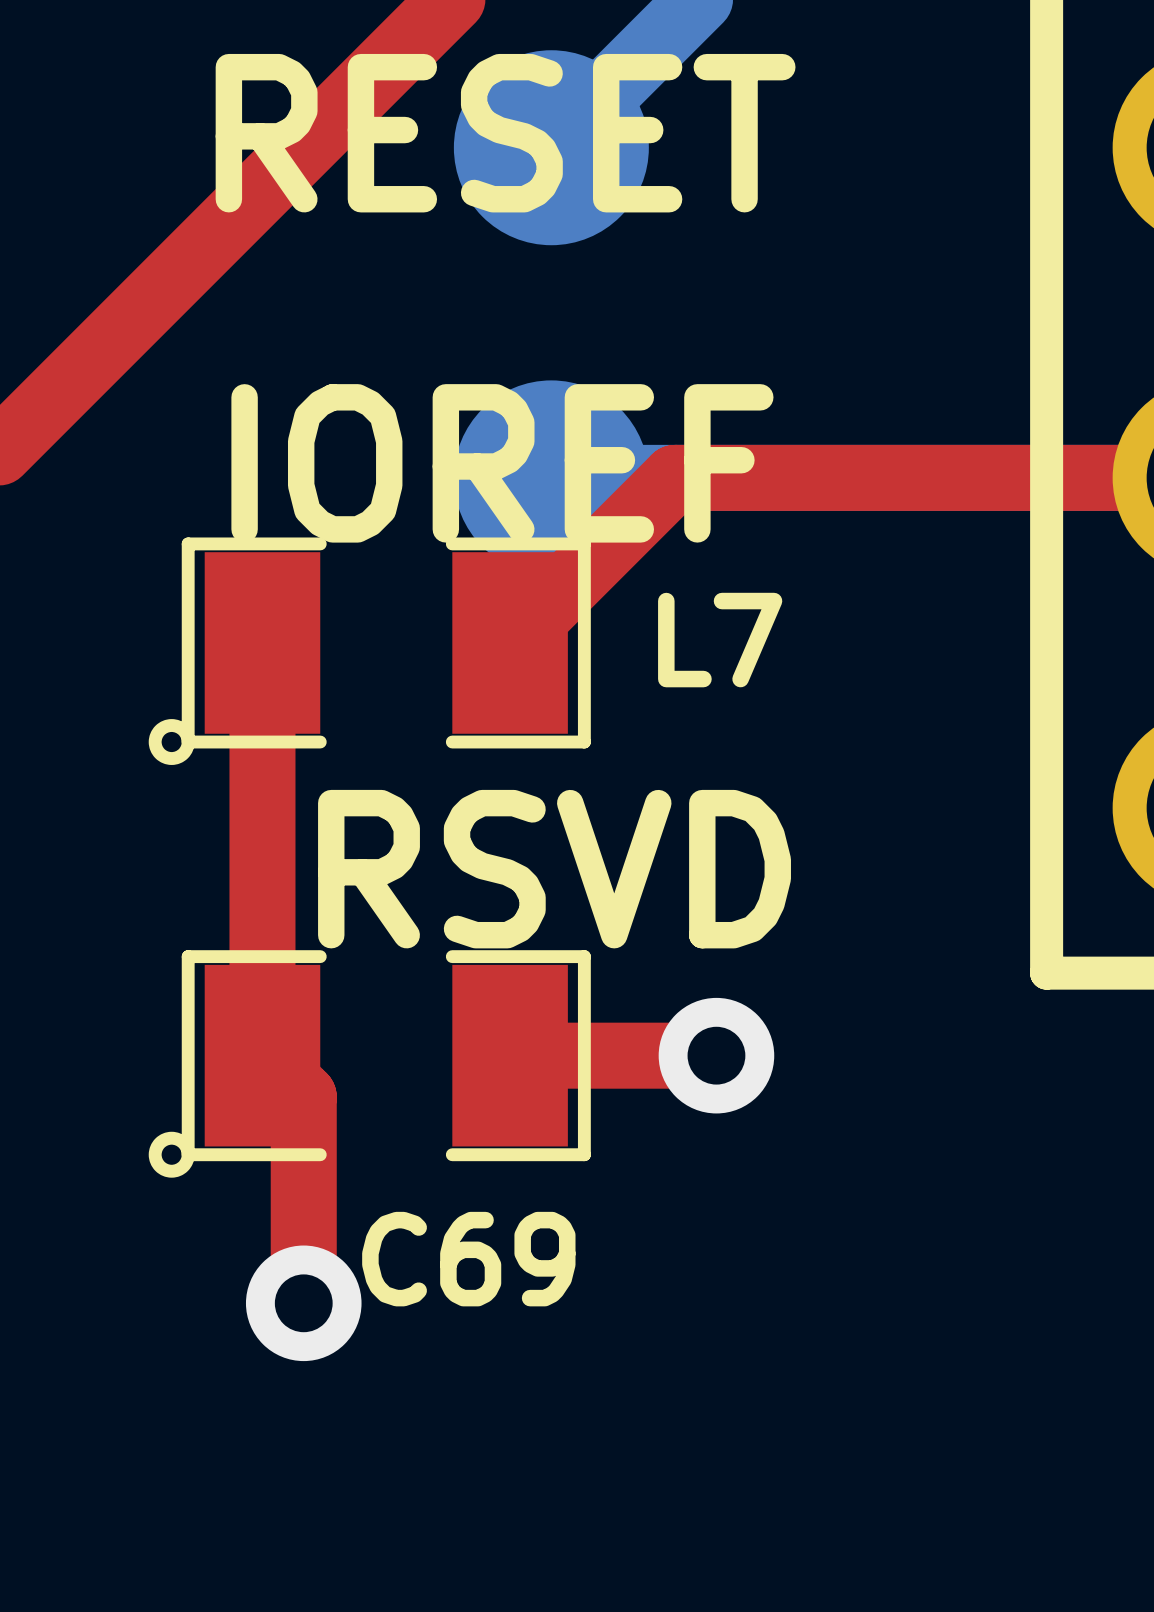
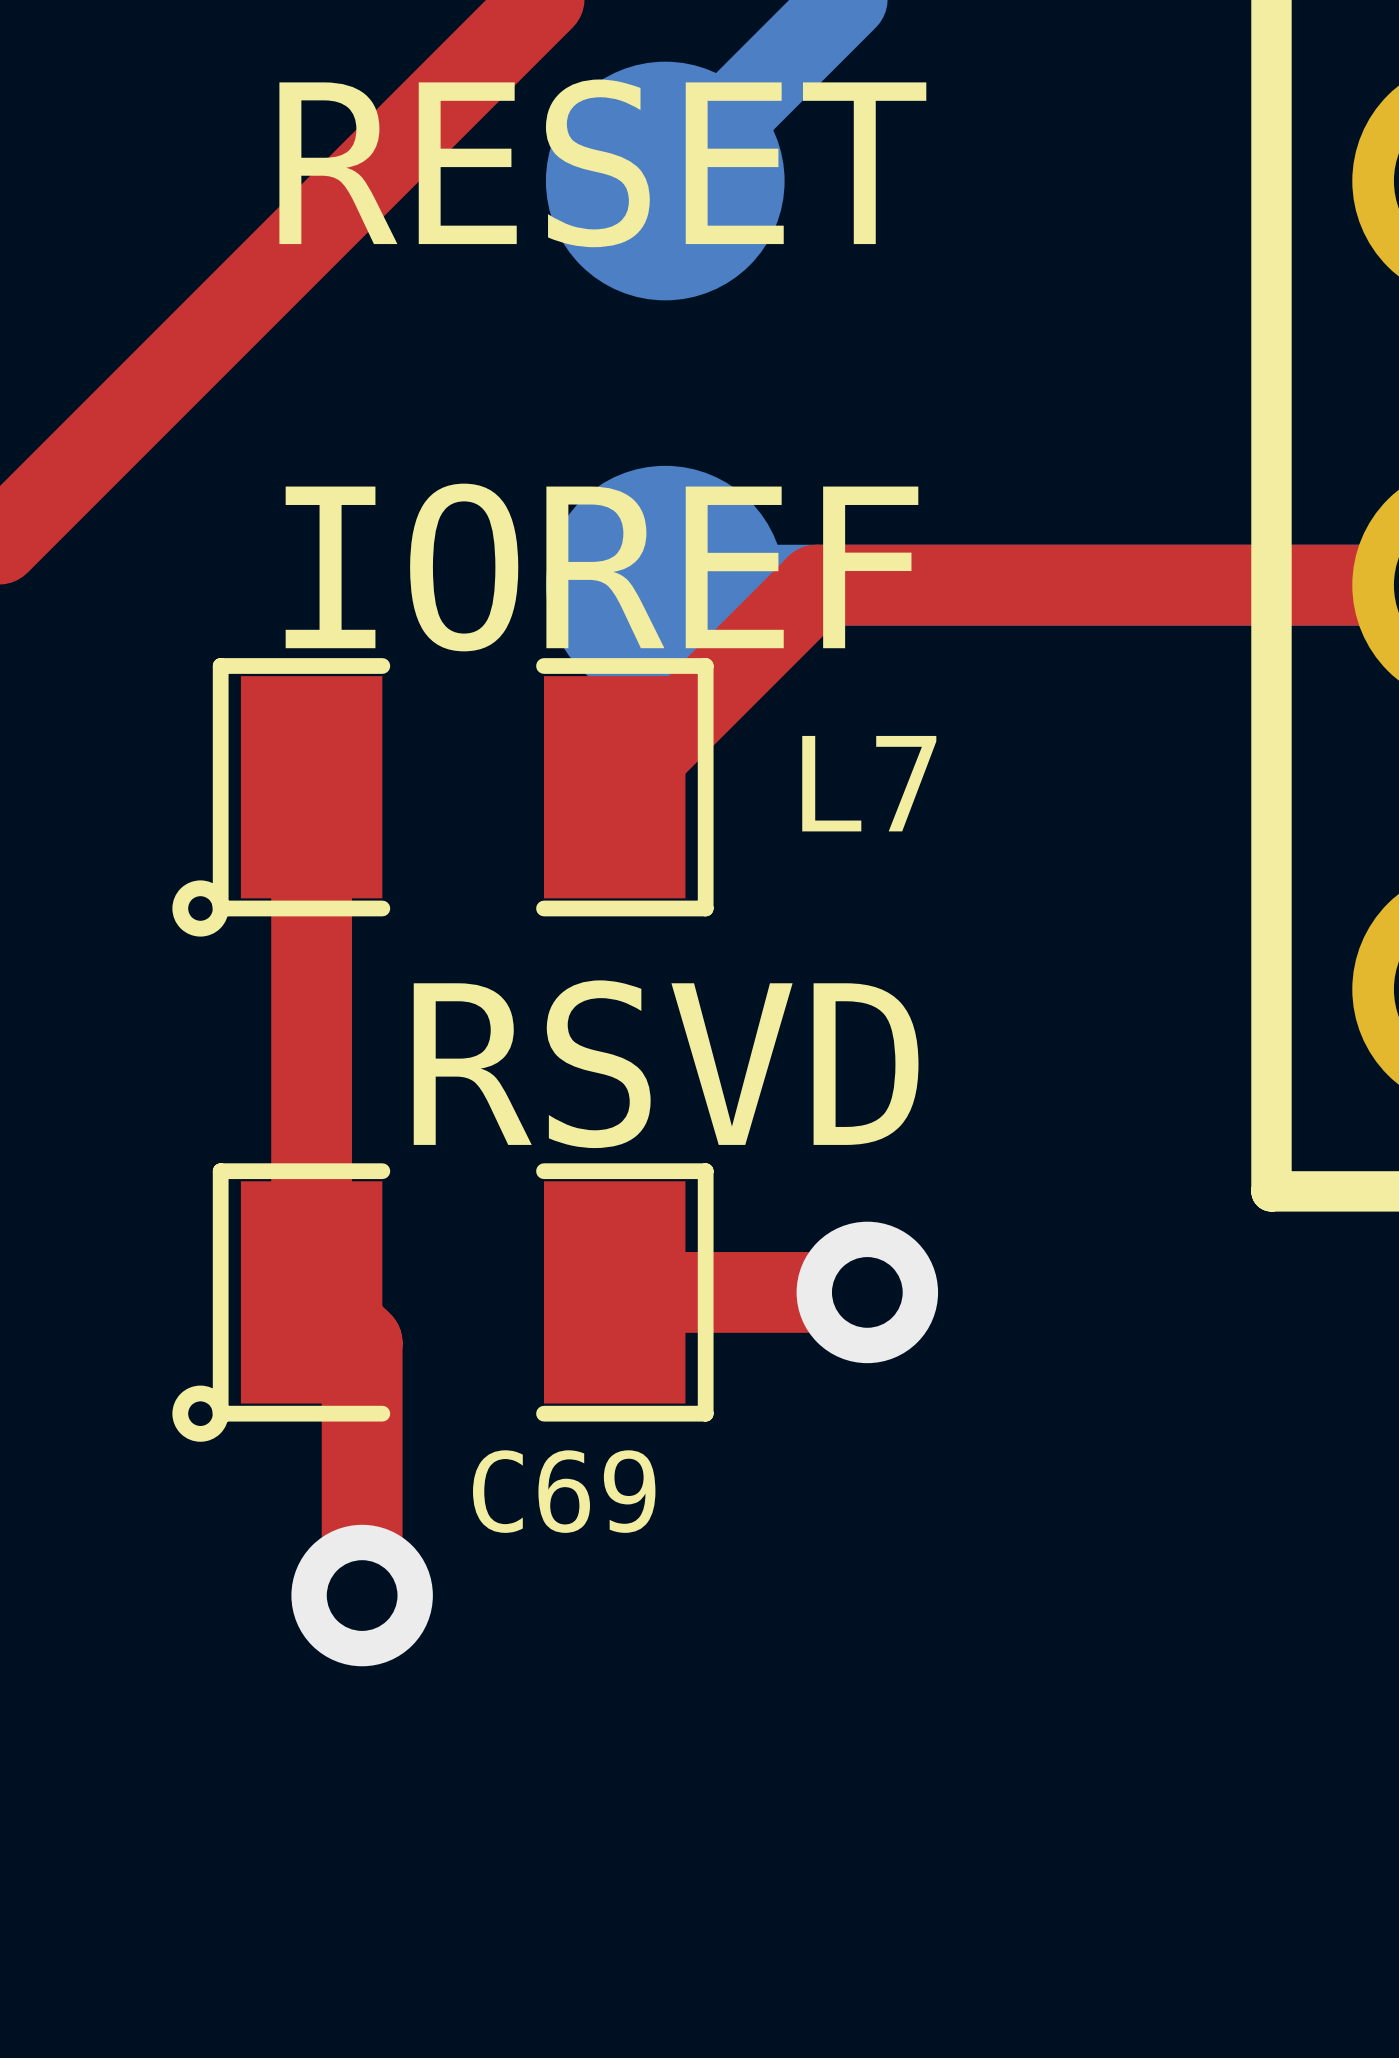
C69 name position: C69 (468, 1259) -> C69 (564, 1491)

